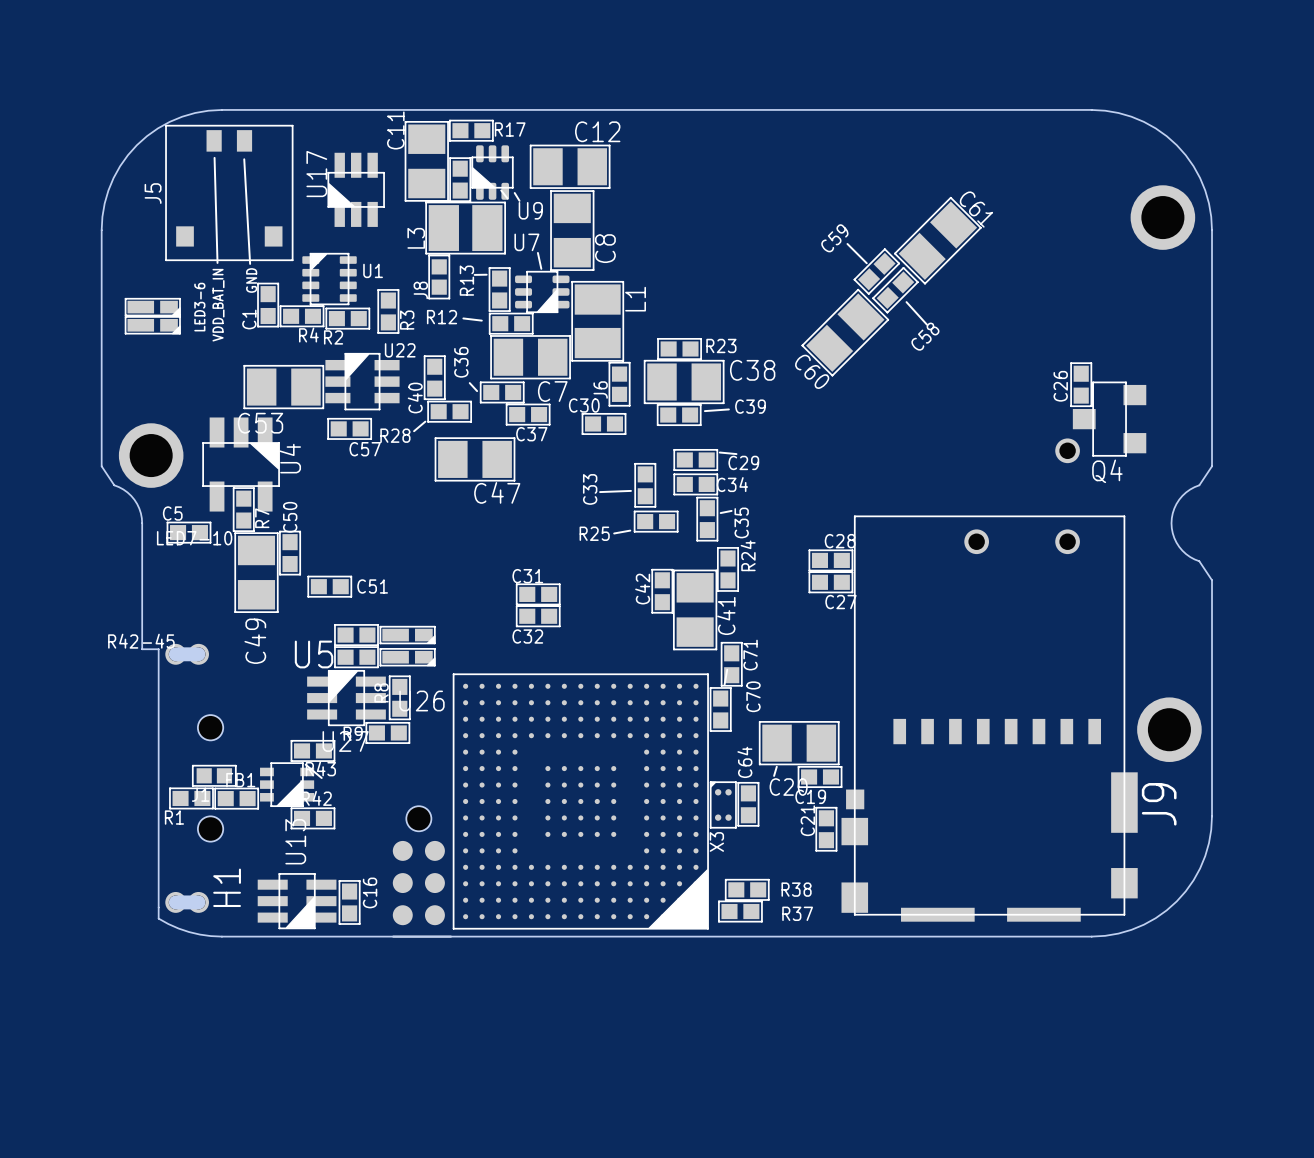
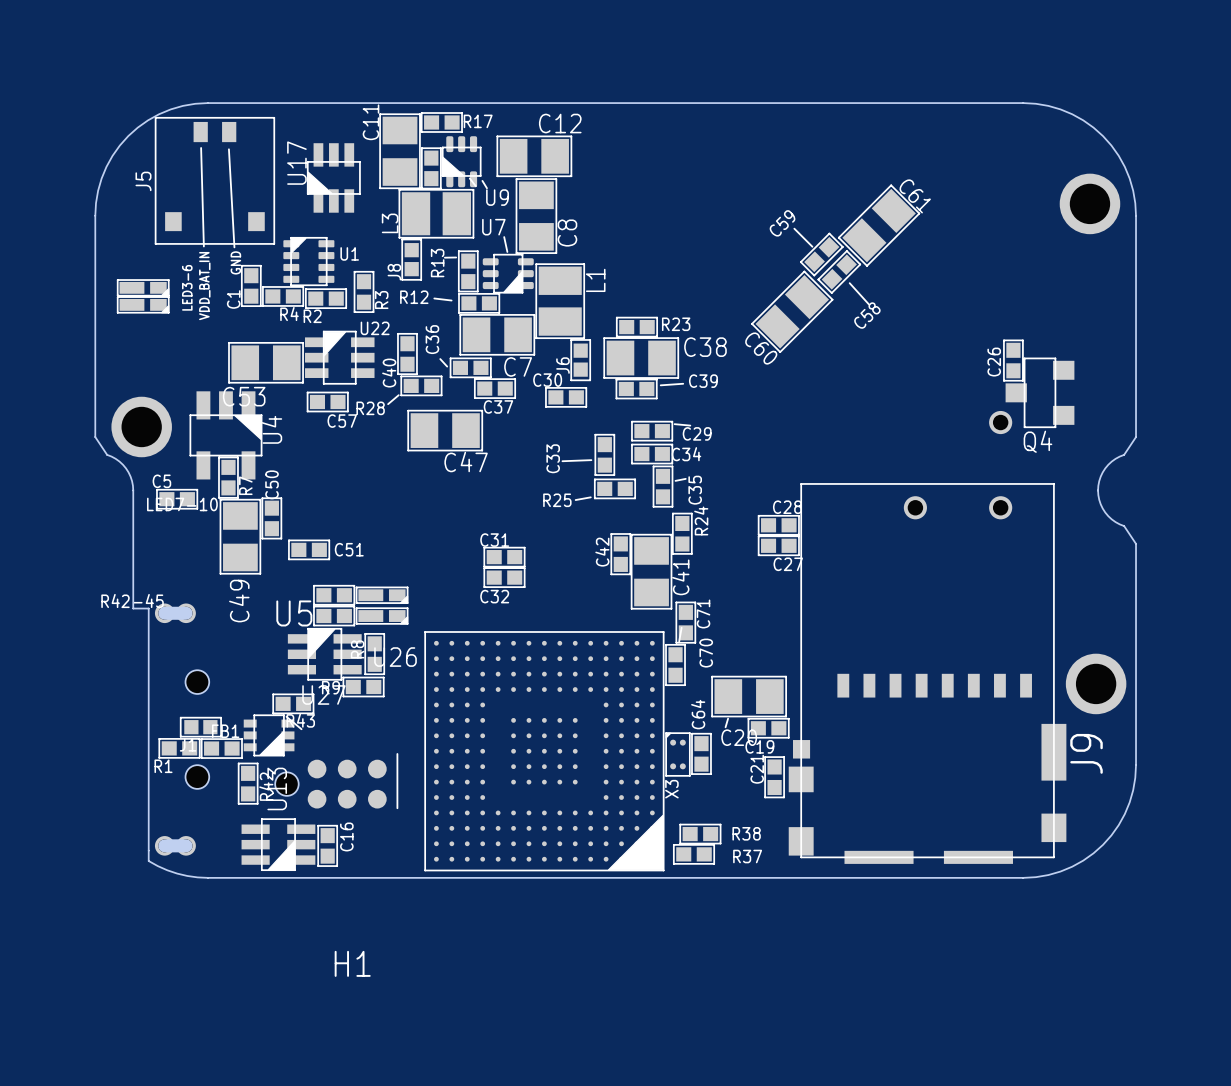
R42 rotation: 0° (312, 818) -> 90° clockwise (248, 783)
R42 position: (312, 818) -> (248, 783)
H1 rotation: 0° (422, 871) -> 90° counterclockwise (336, 781)

